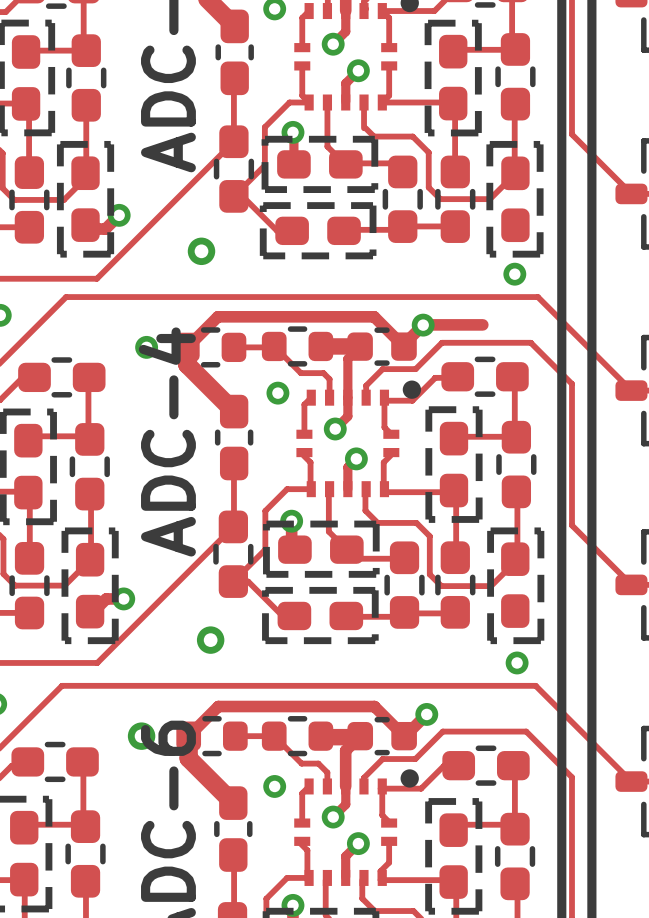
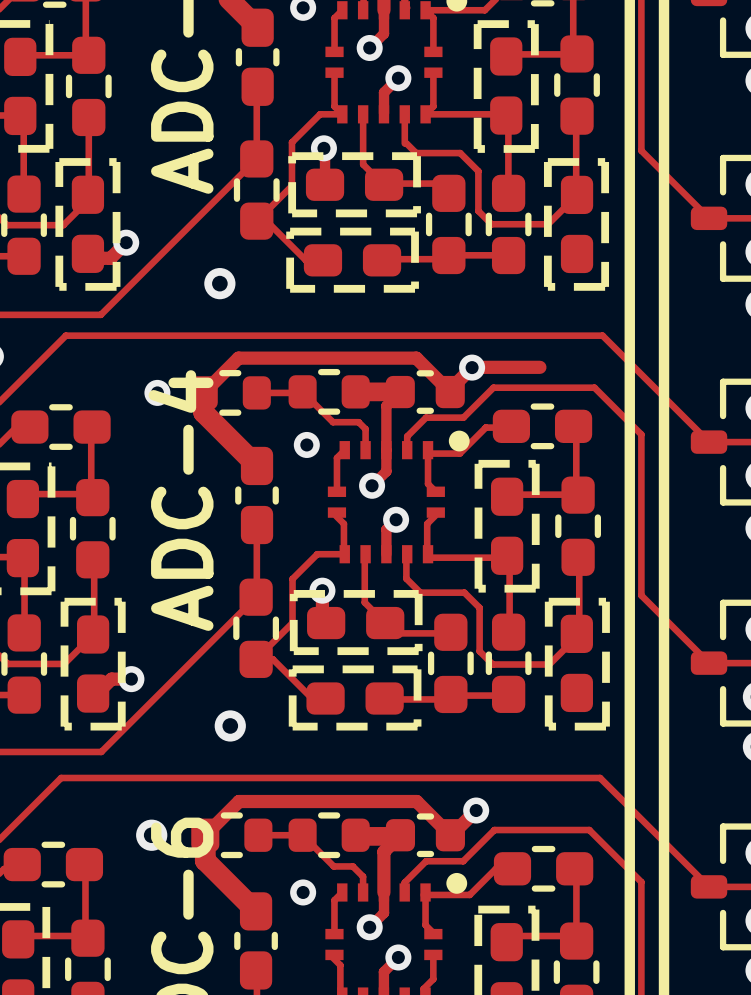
via: (514, 274) -> none
via: (517, 662) -> none

